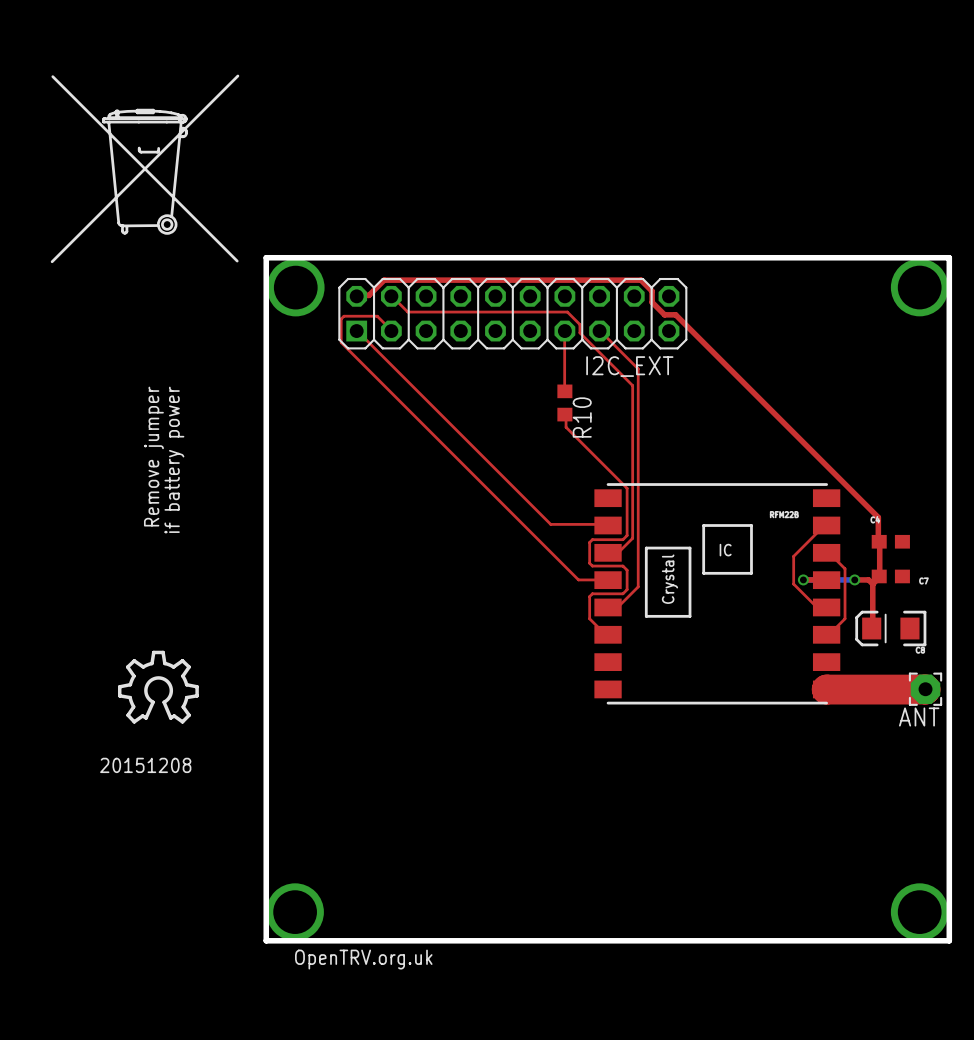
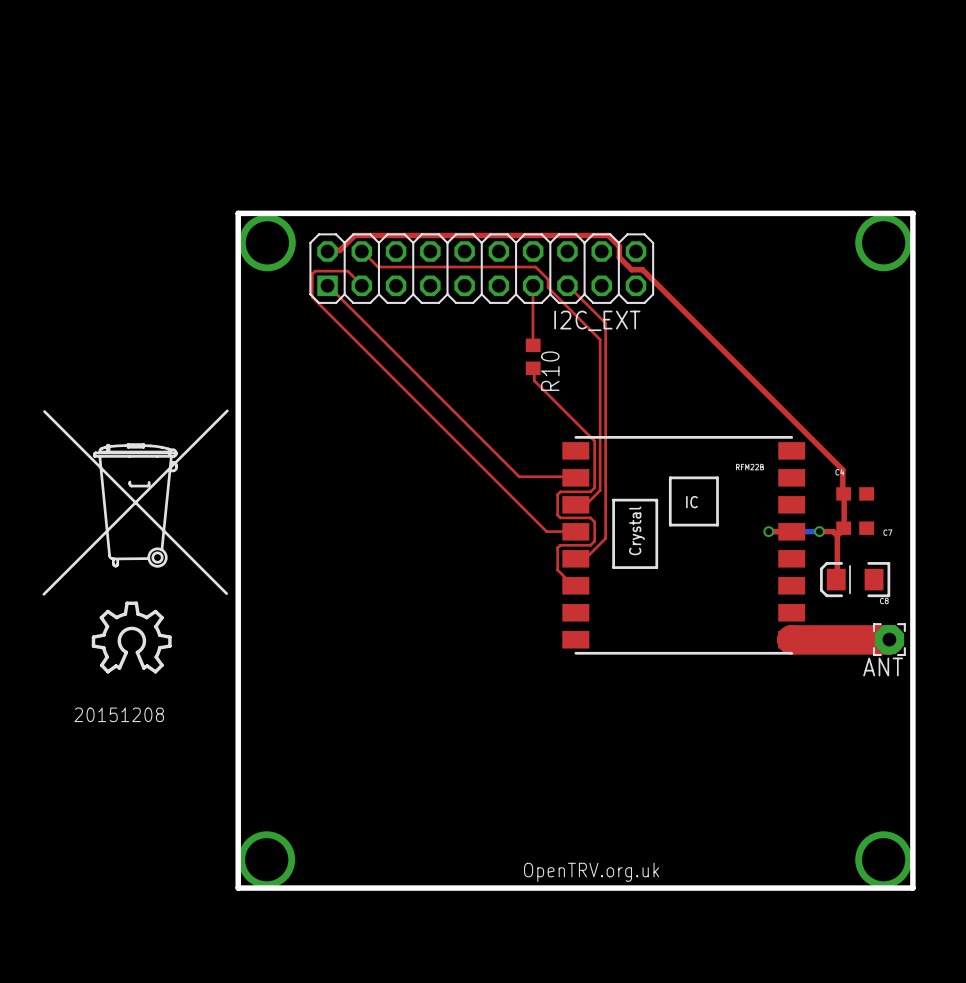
drawing: [50, 74, 240, 264] -> none
drawing: none -> [42, 409, 229, 596]
text: Remove jumper (153, 456) -> none
text: if battery power (174, 460) -> none
top track: (826, 525) (793, 556) (793, 584) (815, 606) (826, 607) -> none
top track: (826, 552) (829, 553) (845, 568) (845, 618) (829, 634) (826, 634) -> none
text position: OpenTRV.org.uk (363, 959) -> OpenTRV.org.uk (591, 872)

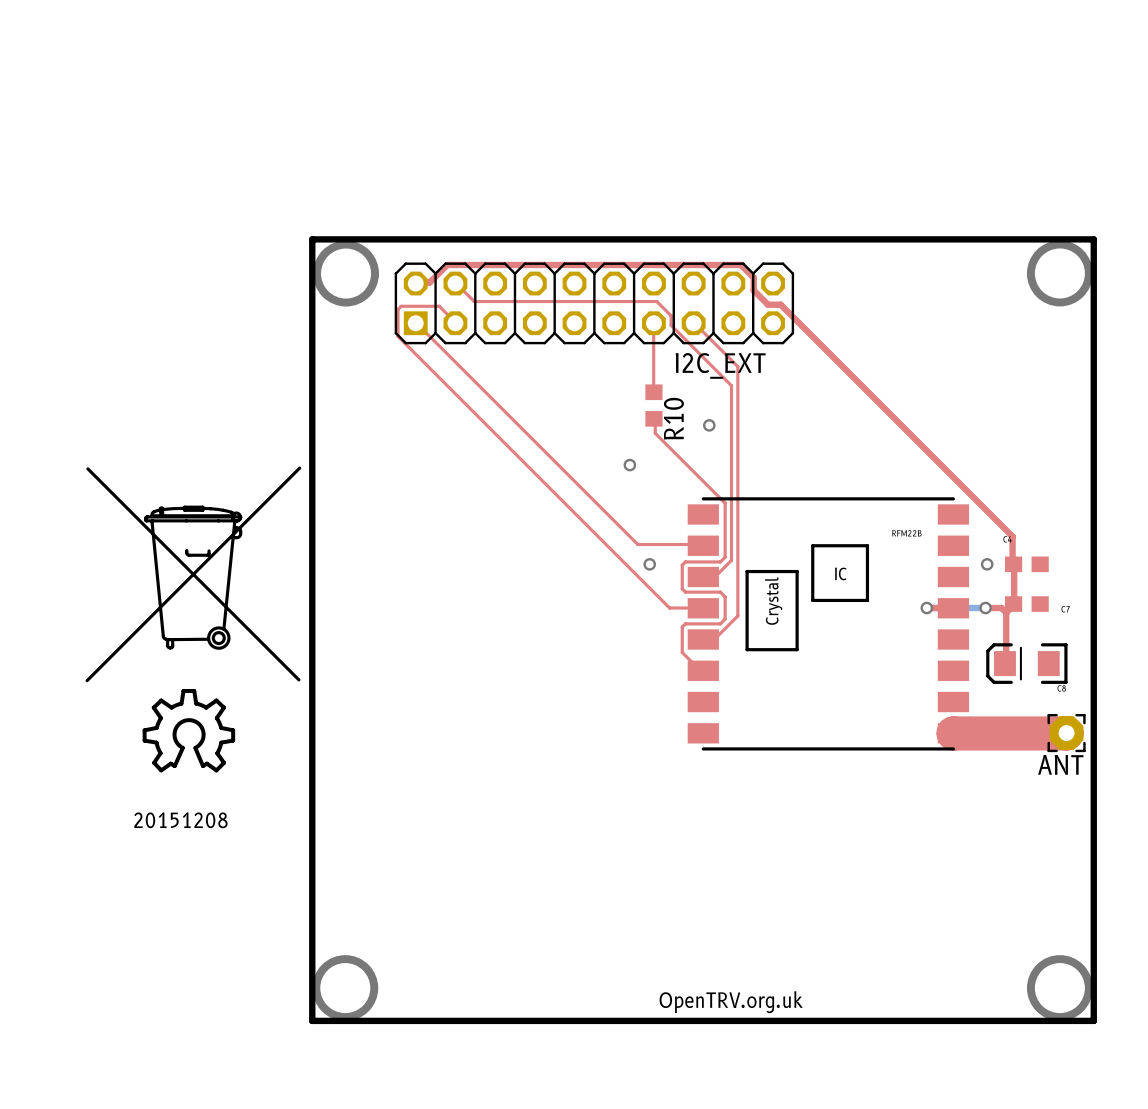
via: none -> (709, 425)
via: none -> (629, 465)
via: none -> (649, 564)
via: none -> (987, 564)

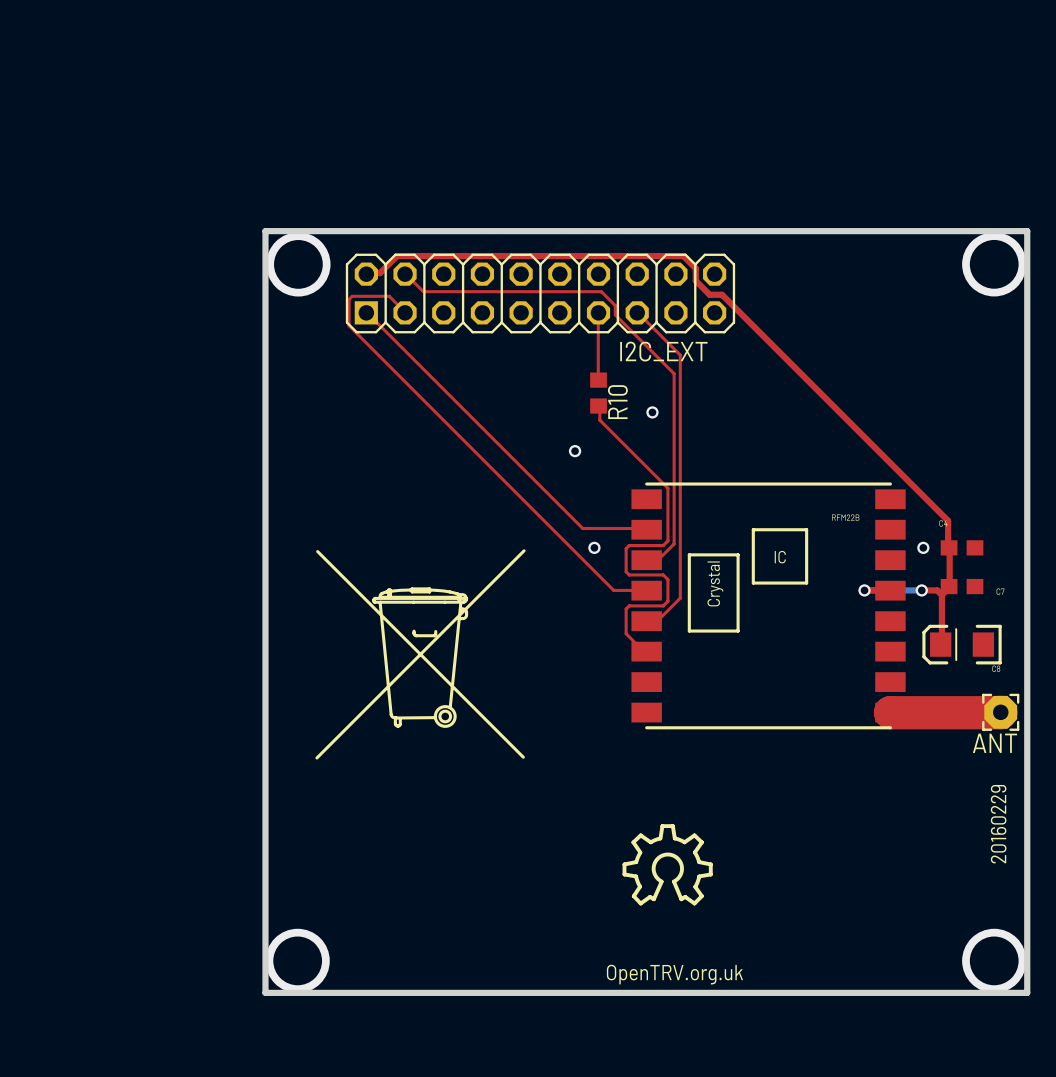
drawing position: (193, 574) -> (420, 654)
drawing: [142, 689, 236, 773] -> none
text: 20151208 (180, 820) -> none
drawing: none -> [622, 824, 713, 906]
text: none -> 20160229 (998, 824)

